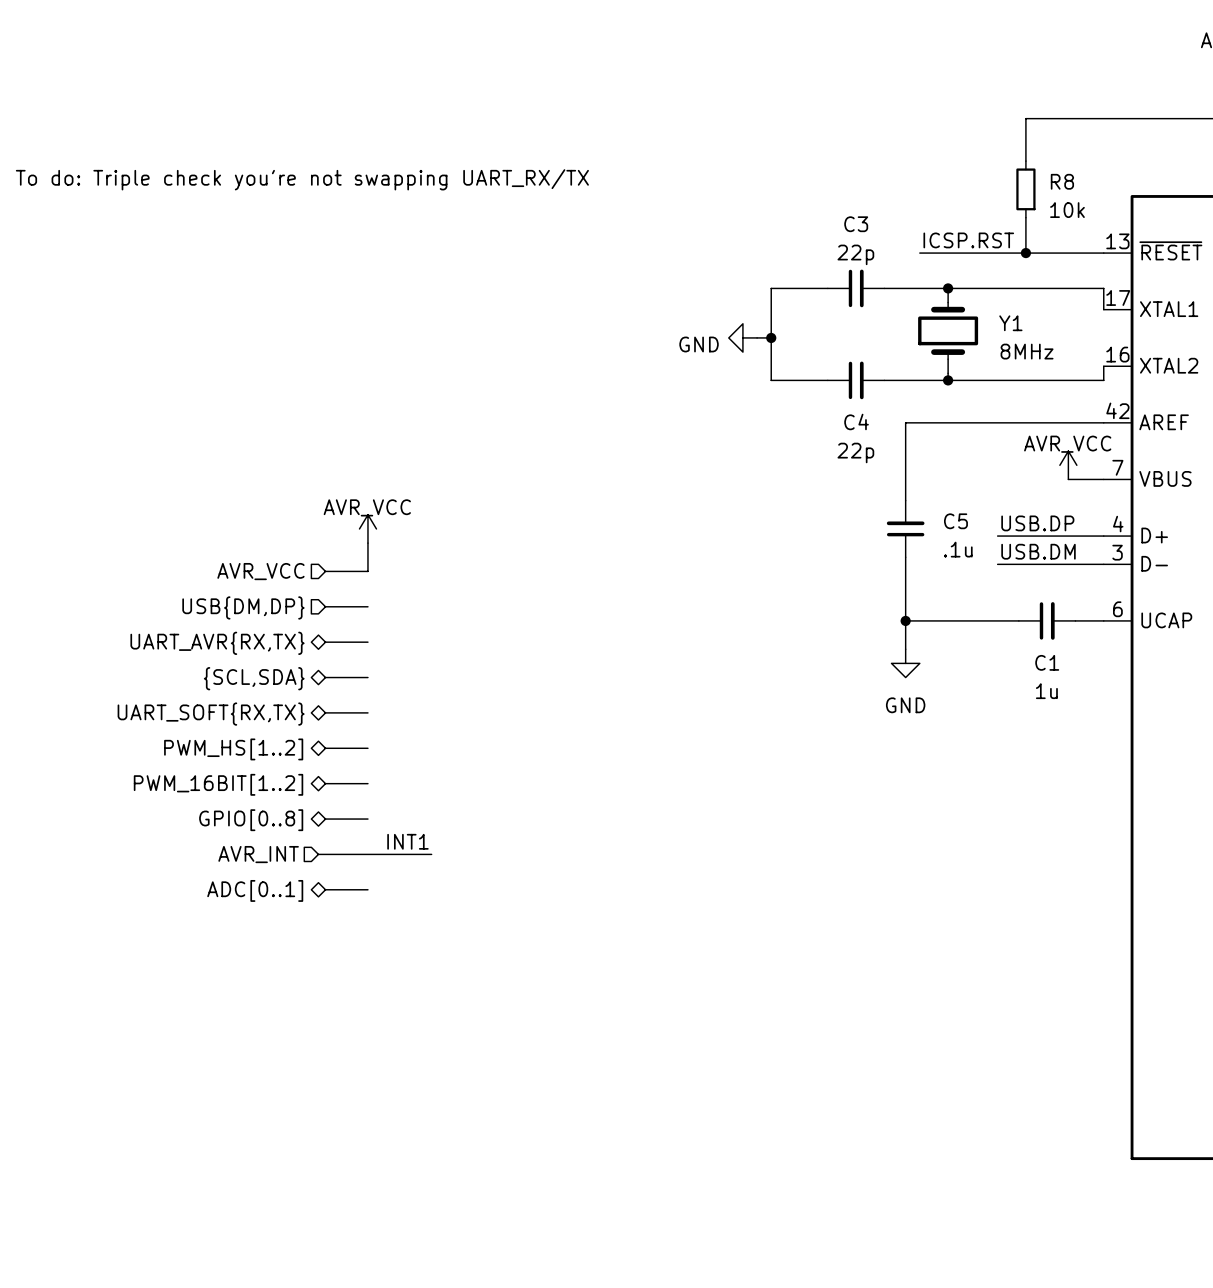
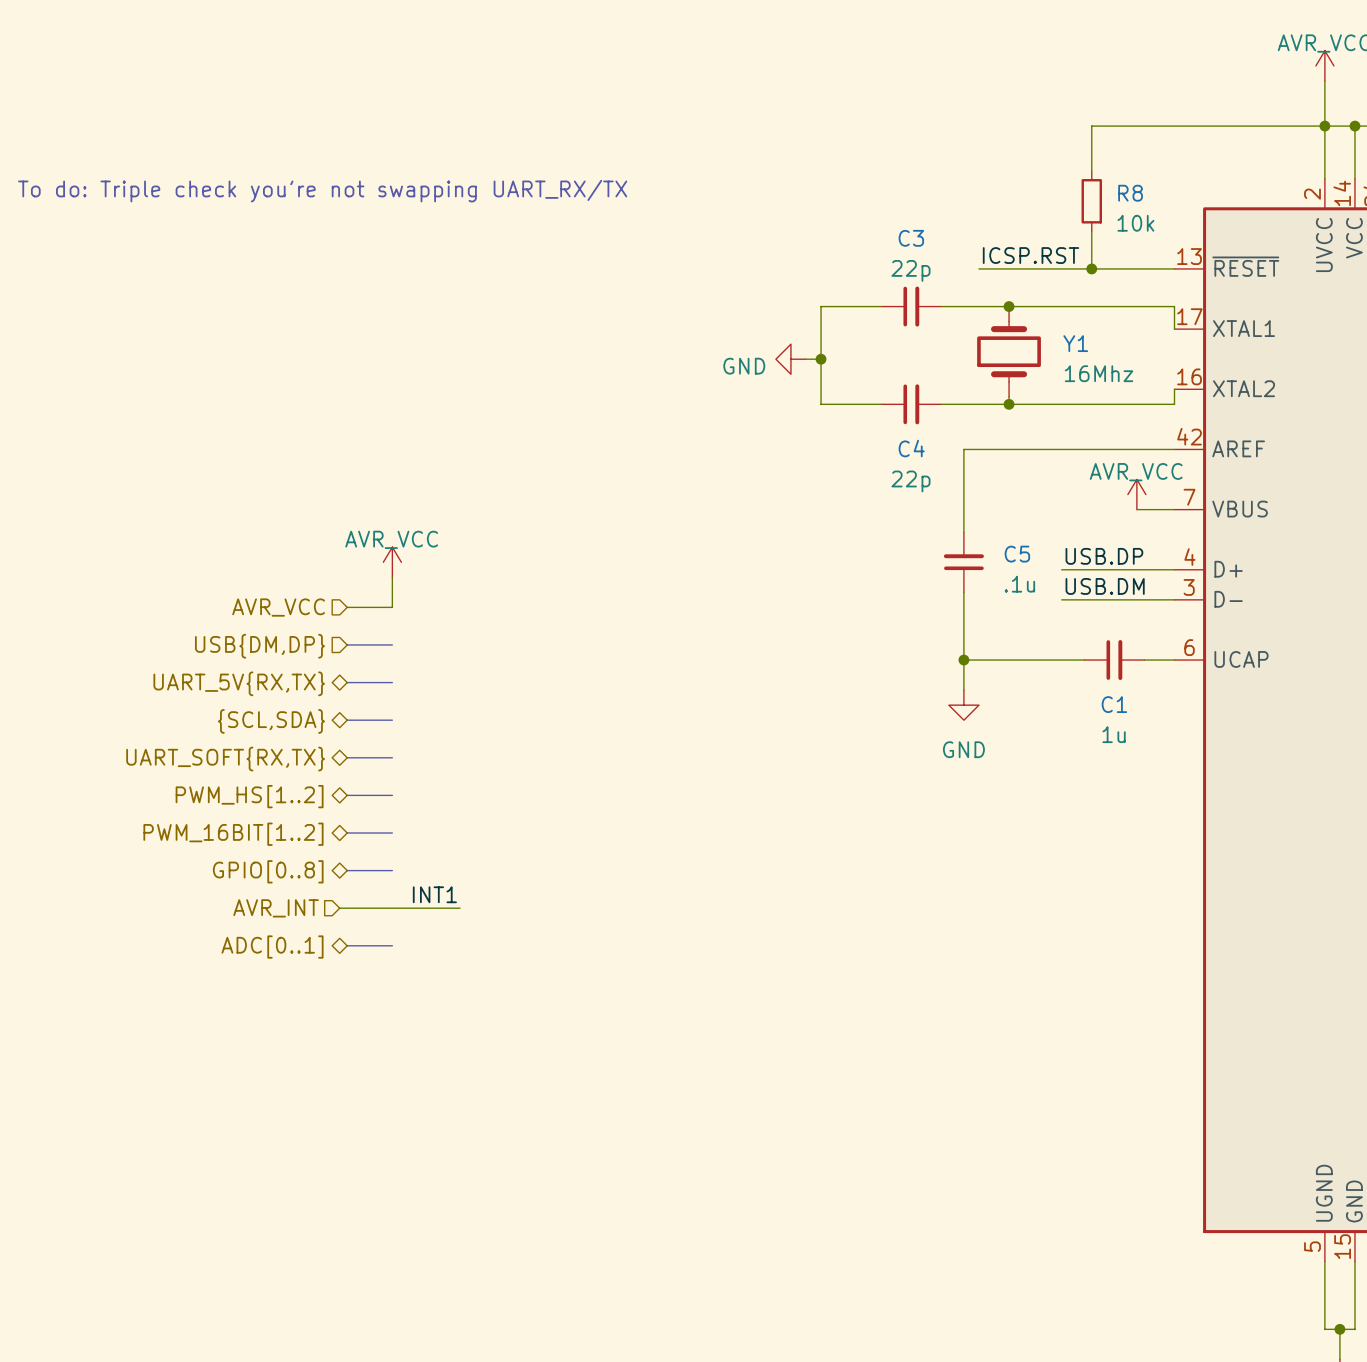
Y1 value: 8MHz (1027, 351) -> 16Mhz (1099, 373)
hierarchical label: UART_AVR{RX,TX} (217, 643) -> UART_5V{RX,TX} (239, 683)

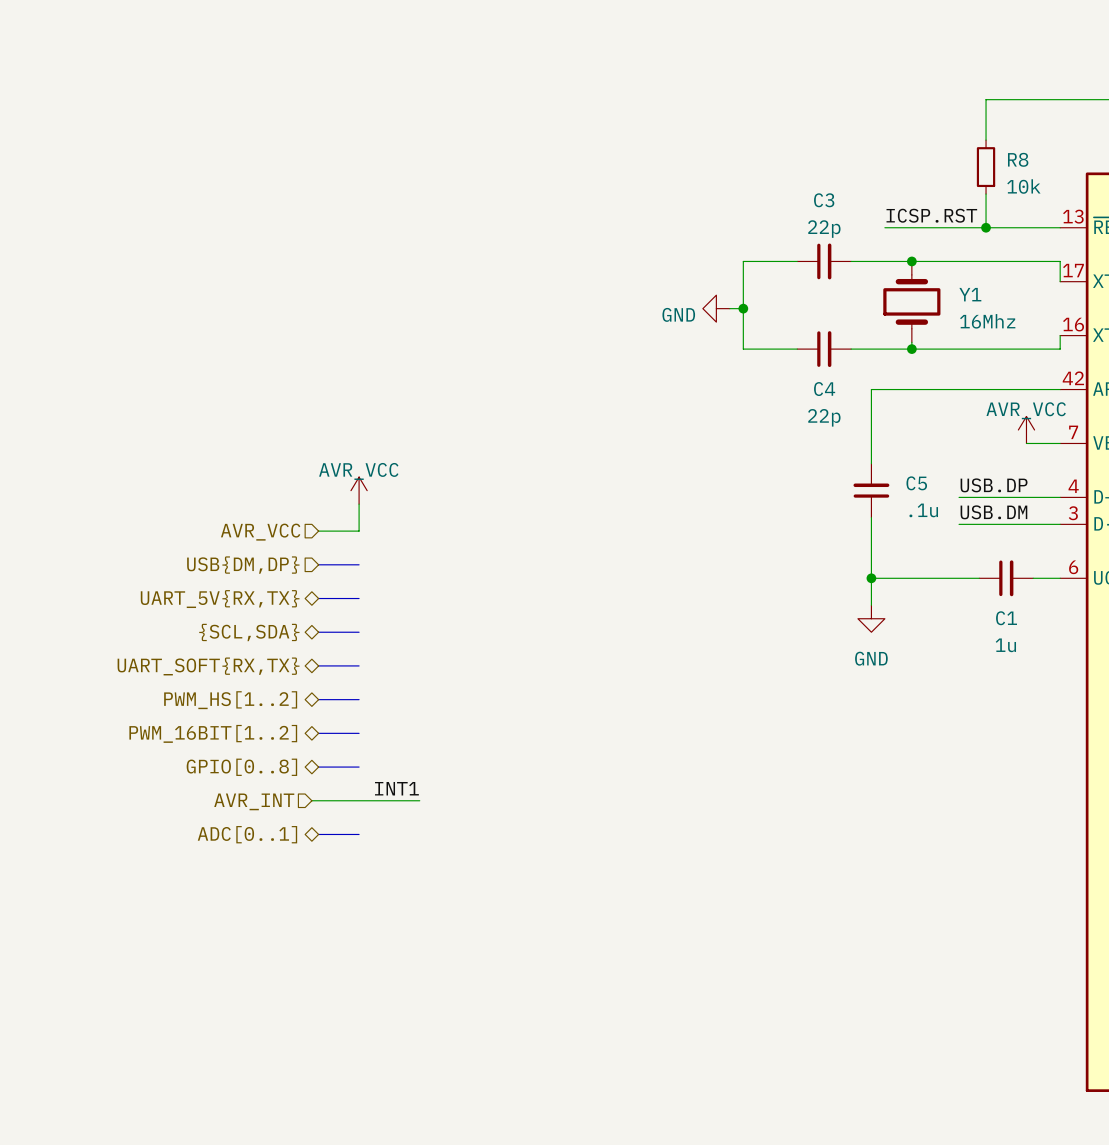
text: To do: Triple check you're not swapping UART_RX/TX (322, 191) -> none

